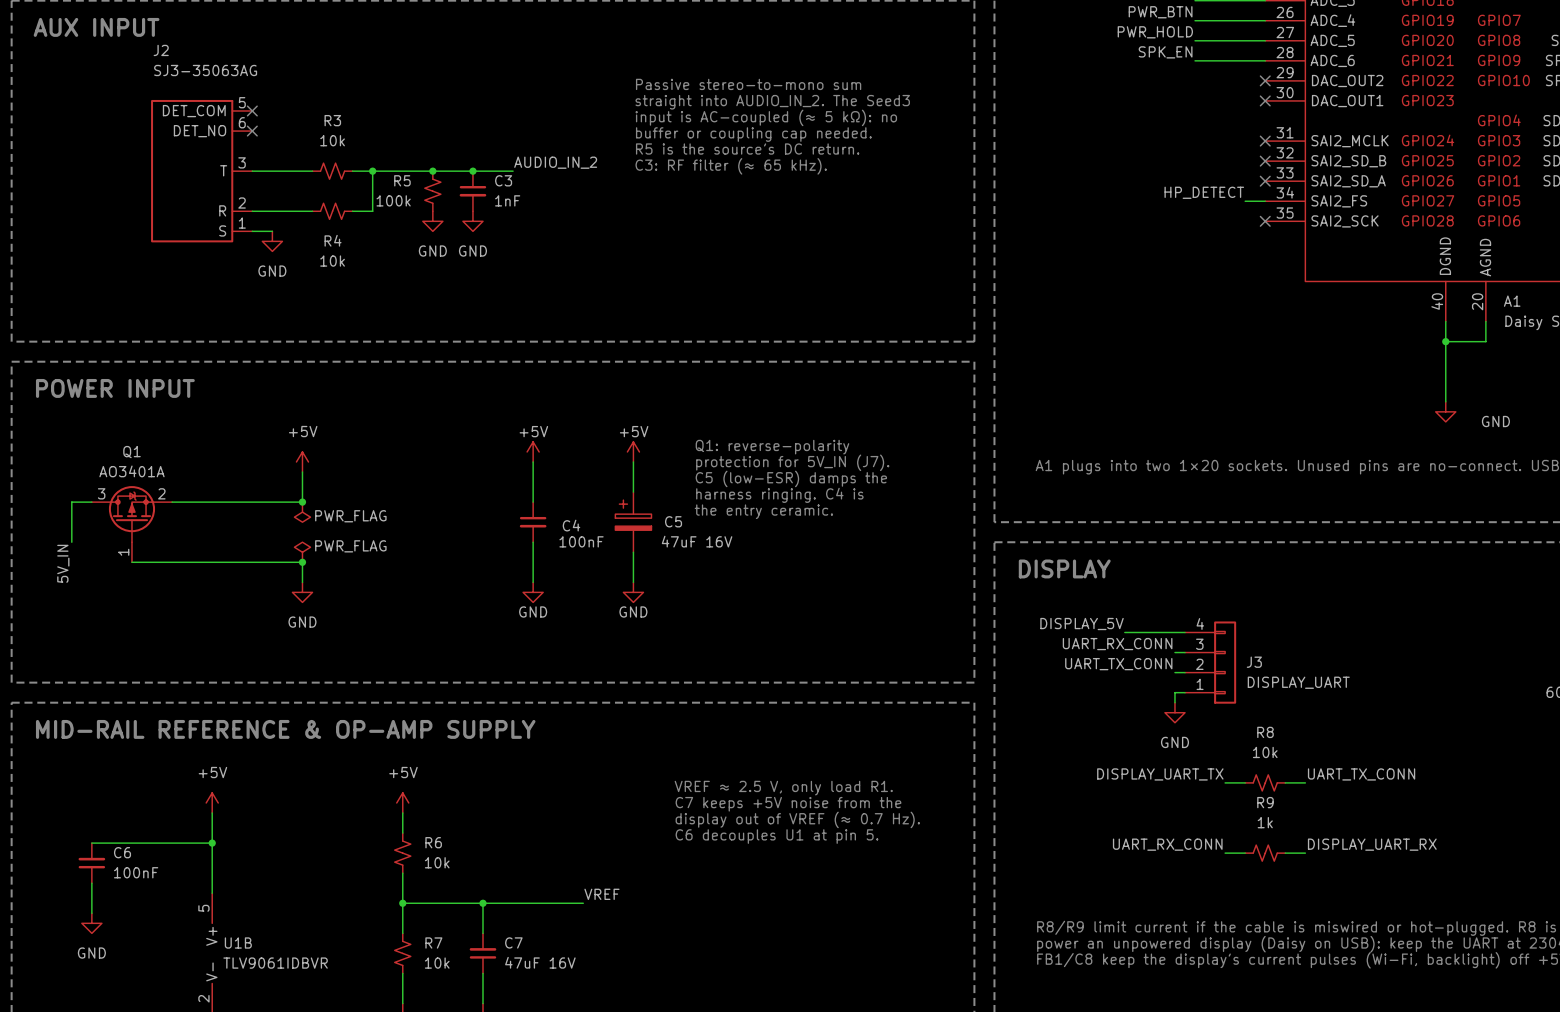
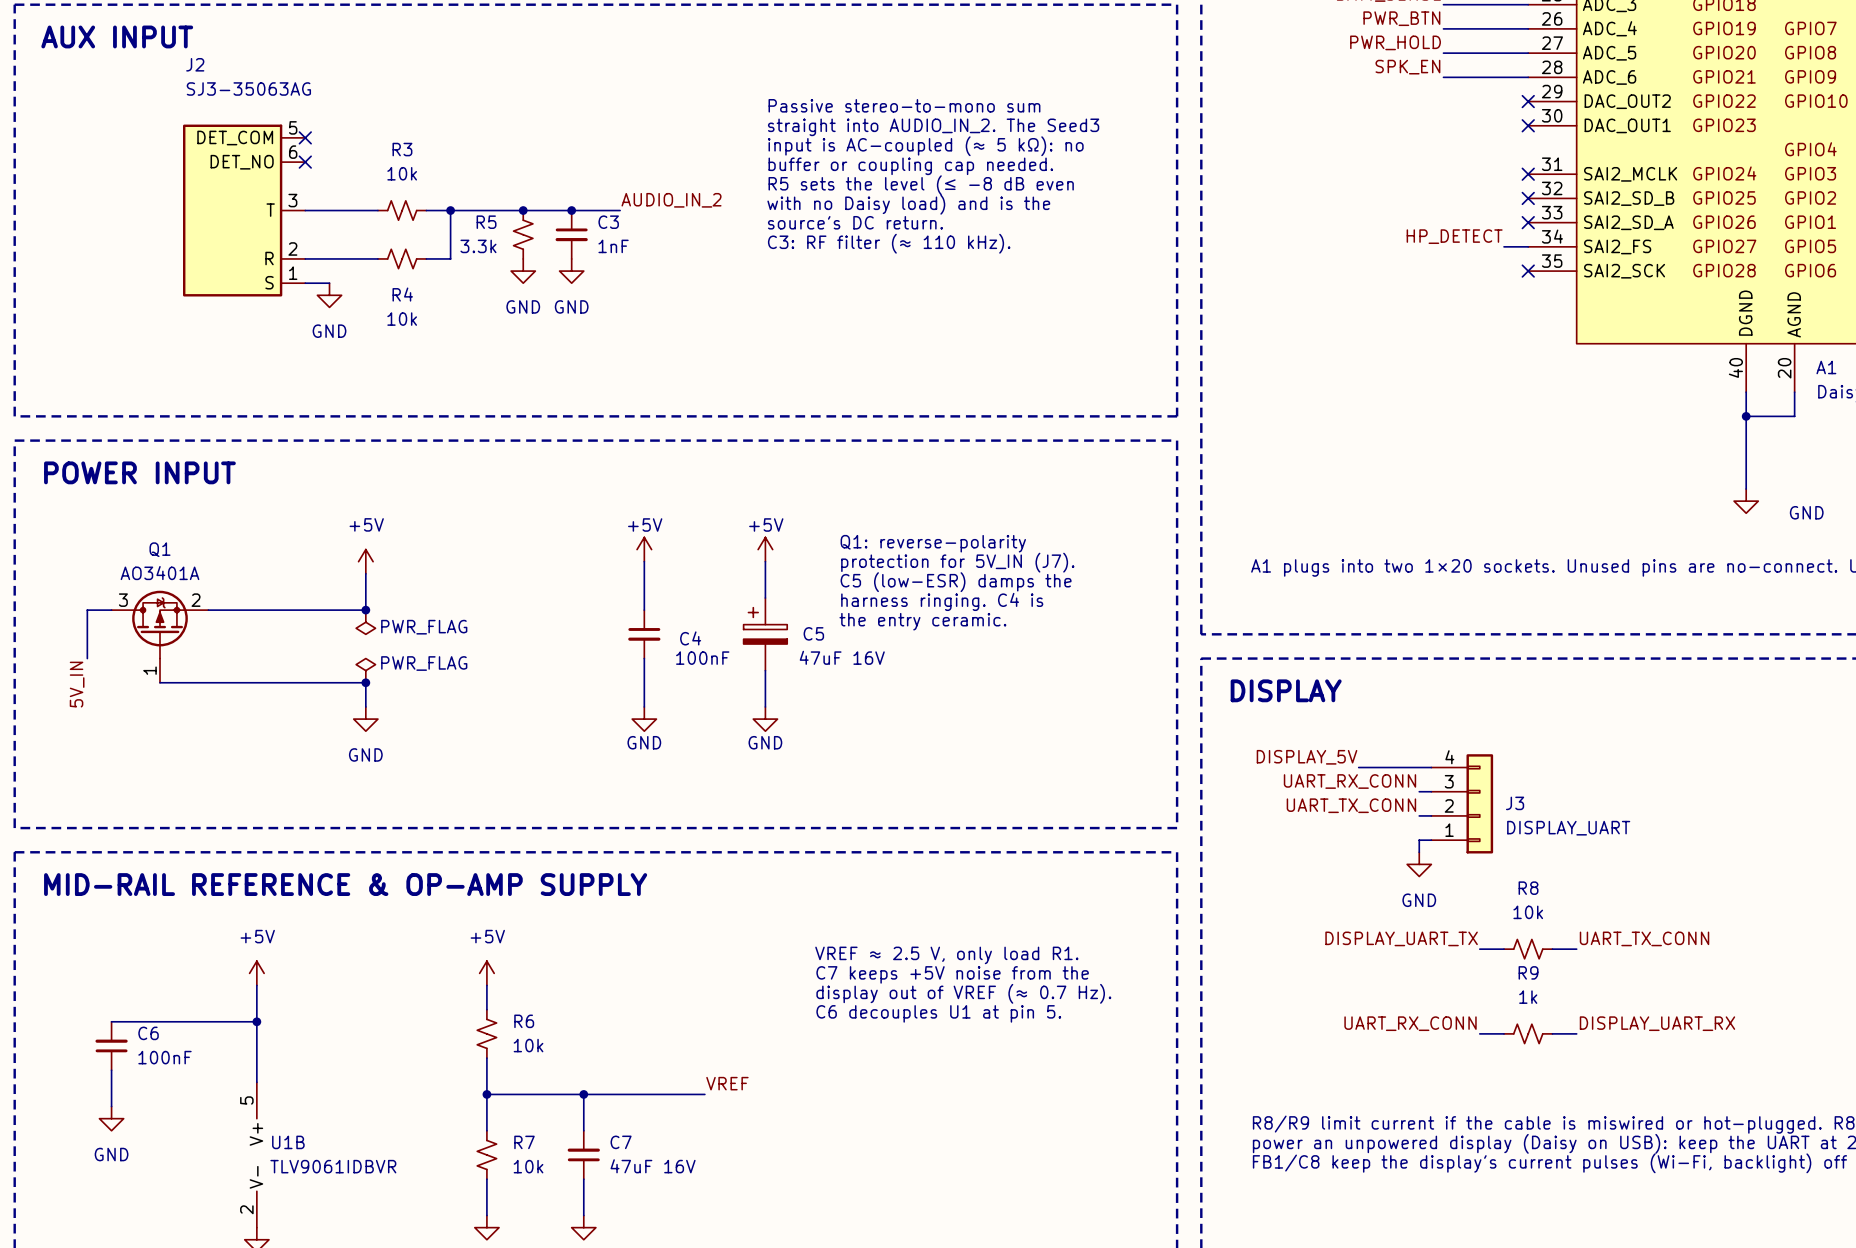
text: R5 is the source's DC return. (747, 149) -> R5 sets the level (≤ −8 dB even (921, 185)
text: C3: RF filter (≈ 65 kHz). (731, 166) -> with no Daisy load) and is the (908, 204)
text: none -> source's DC return. (855, 222)
text: none -> C3: RF filter (≈ 110 kHz). (889, 243)
R5 value: 100k (393, 200) -> 3.3k (478, 246)

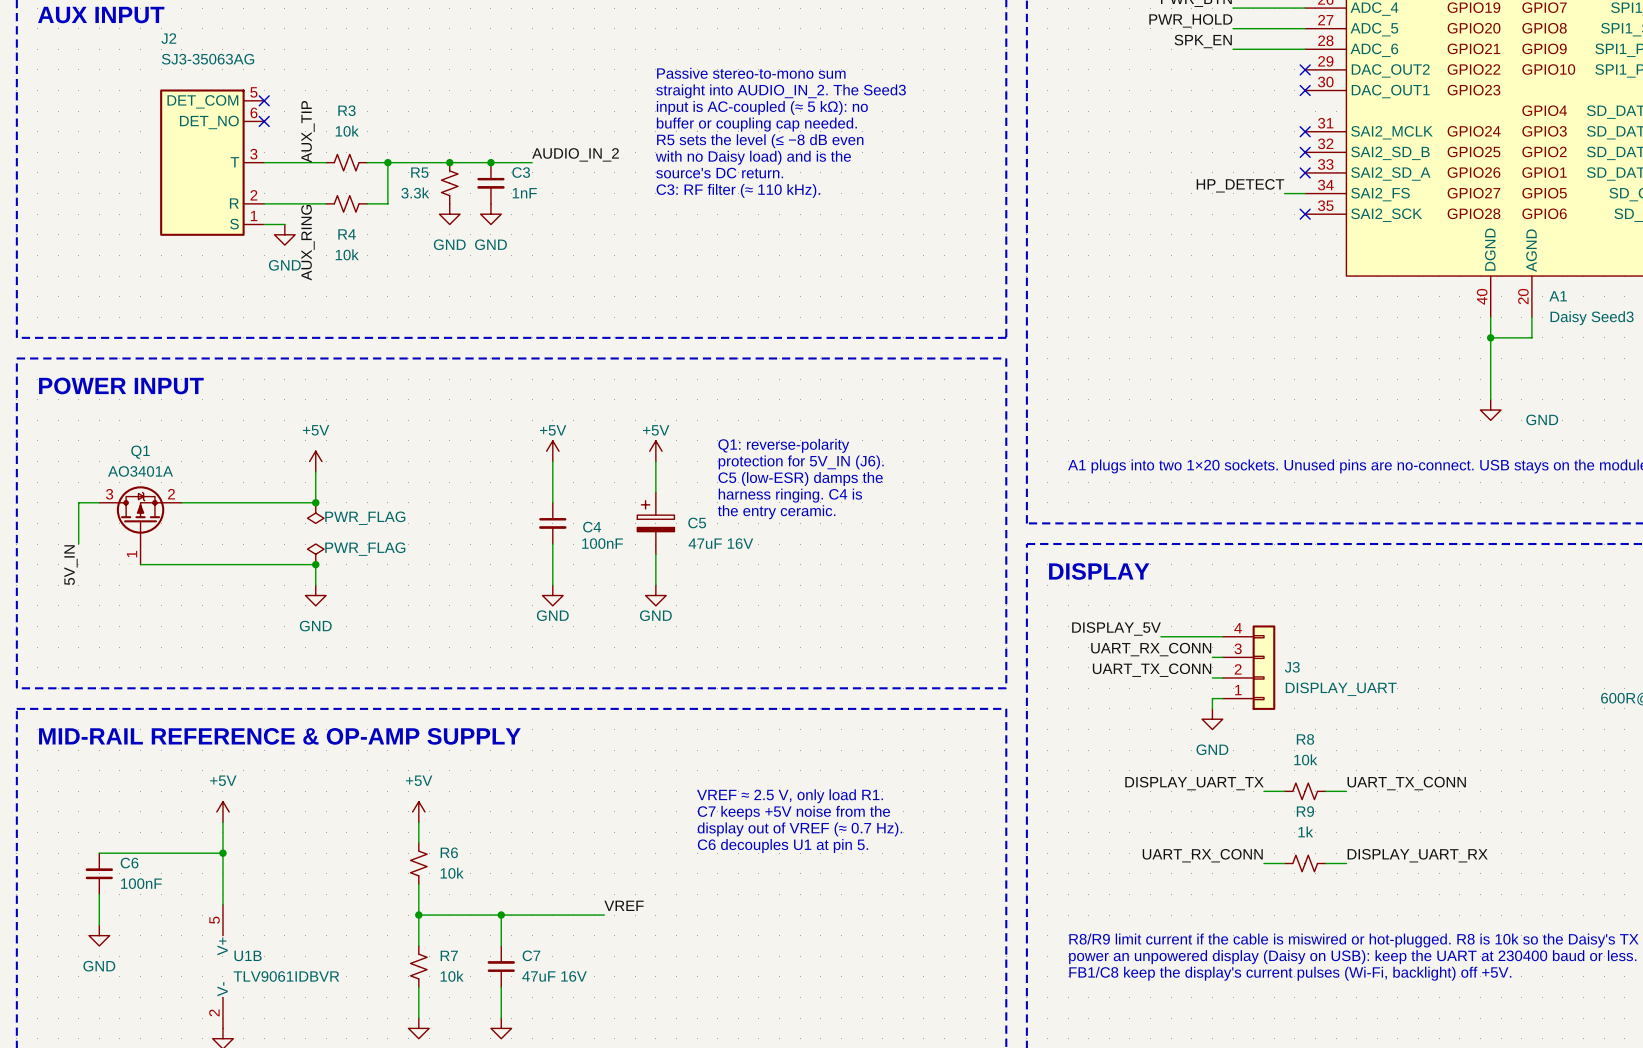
label: none -> AUX_TIP (308, 131)
label: none -> AUX_RING (307, 242)
text: protection for 5V_IN (J7). (957, 562) -> protection for 5V_IN (J6). (801, 462)

